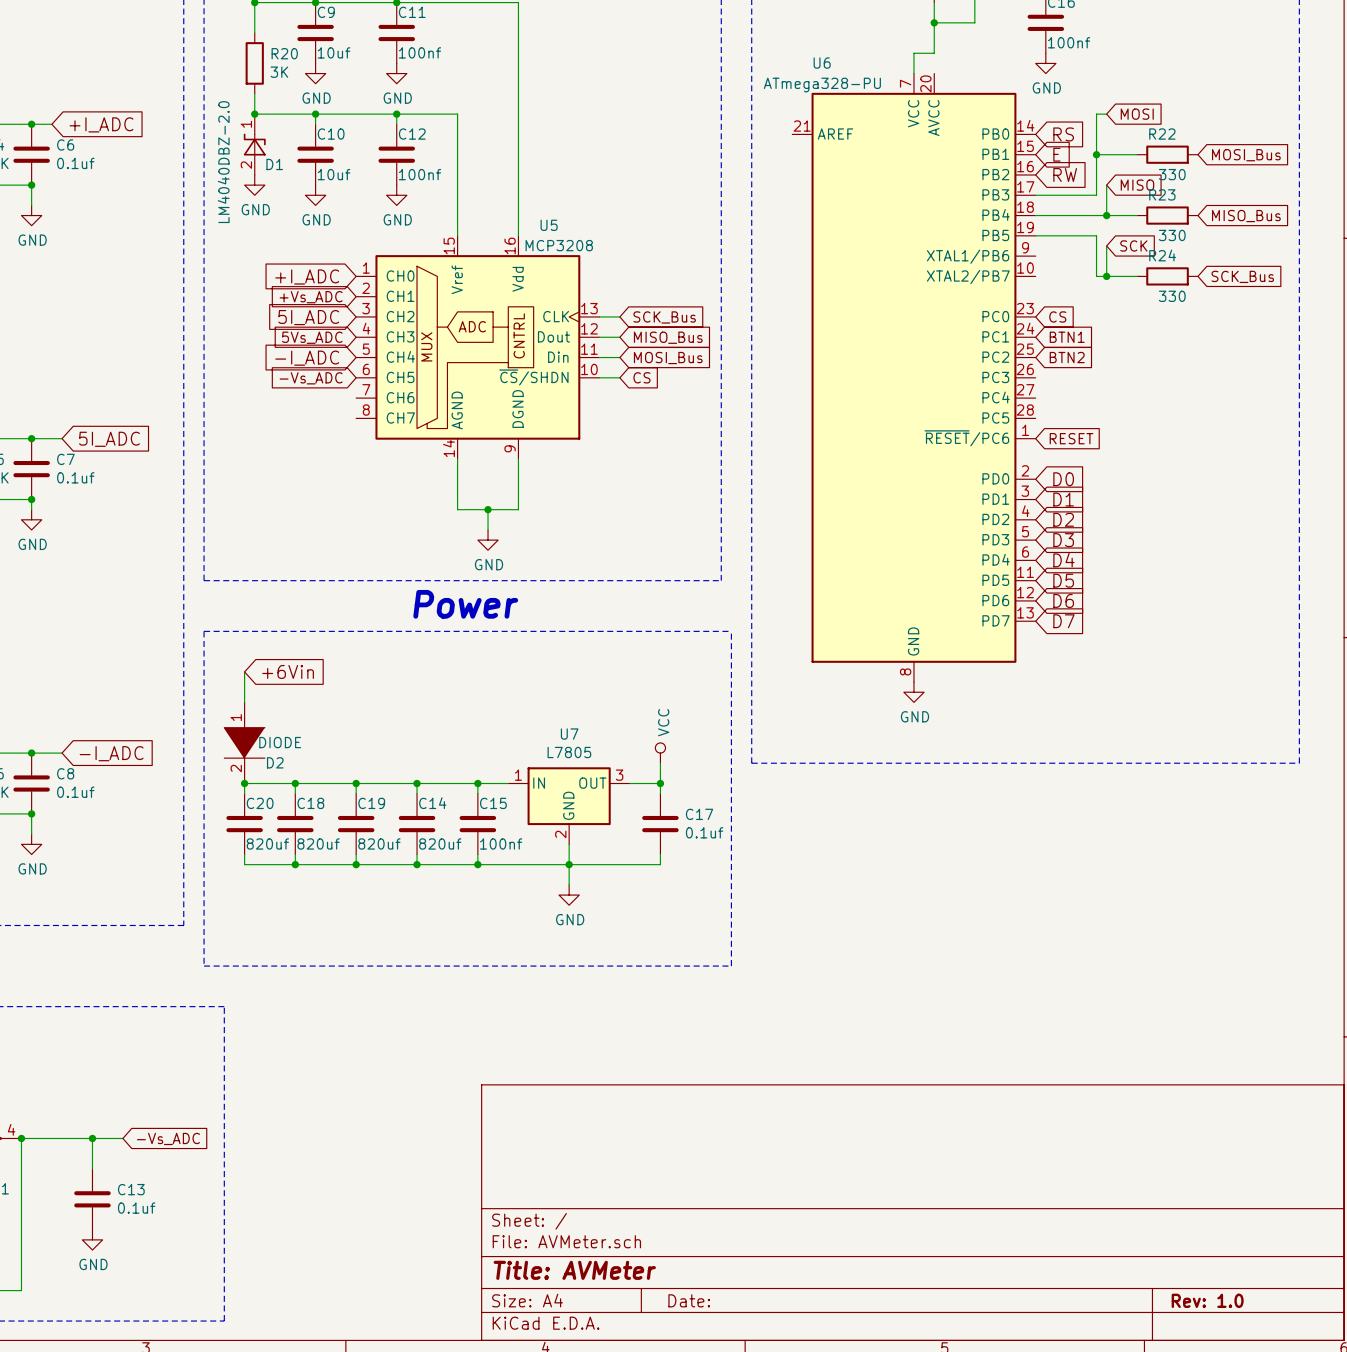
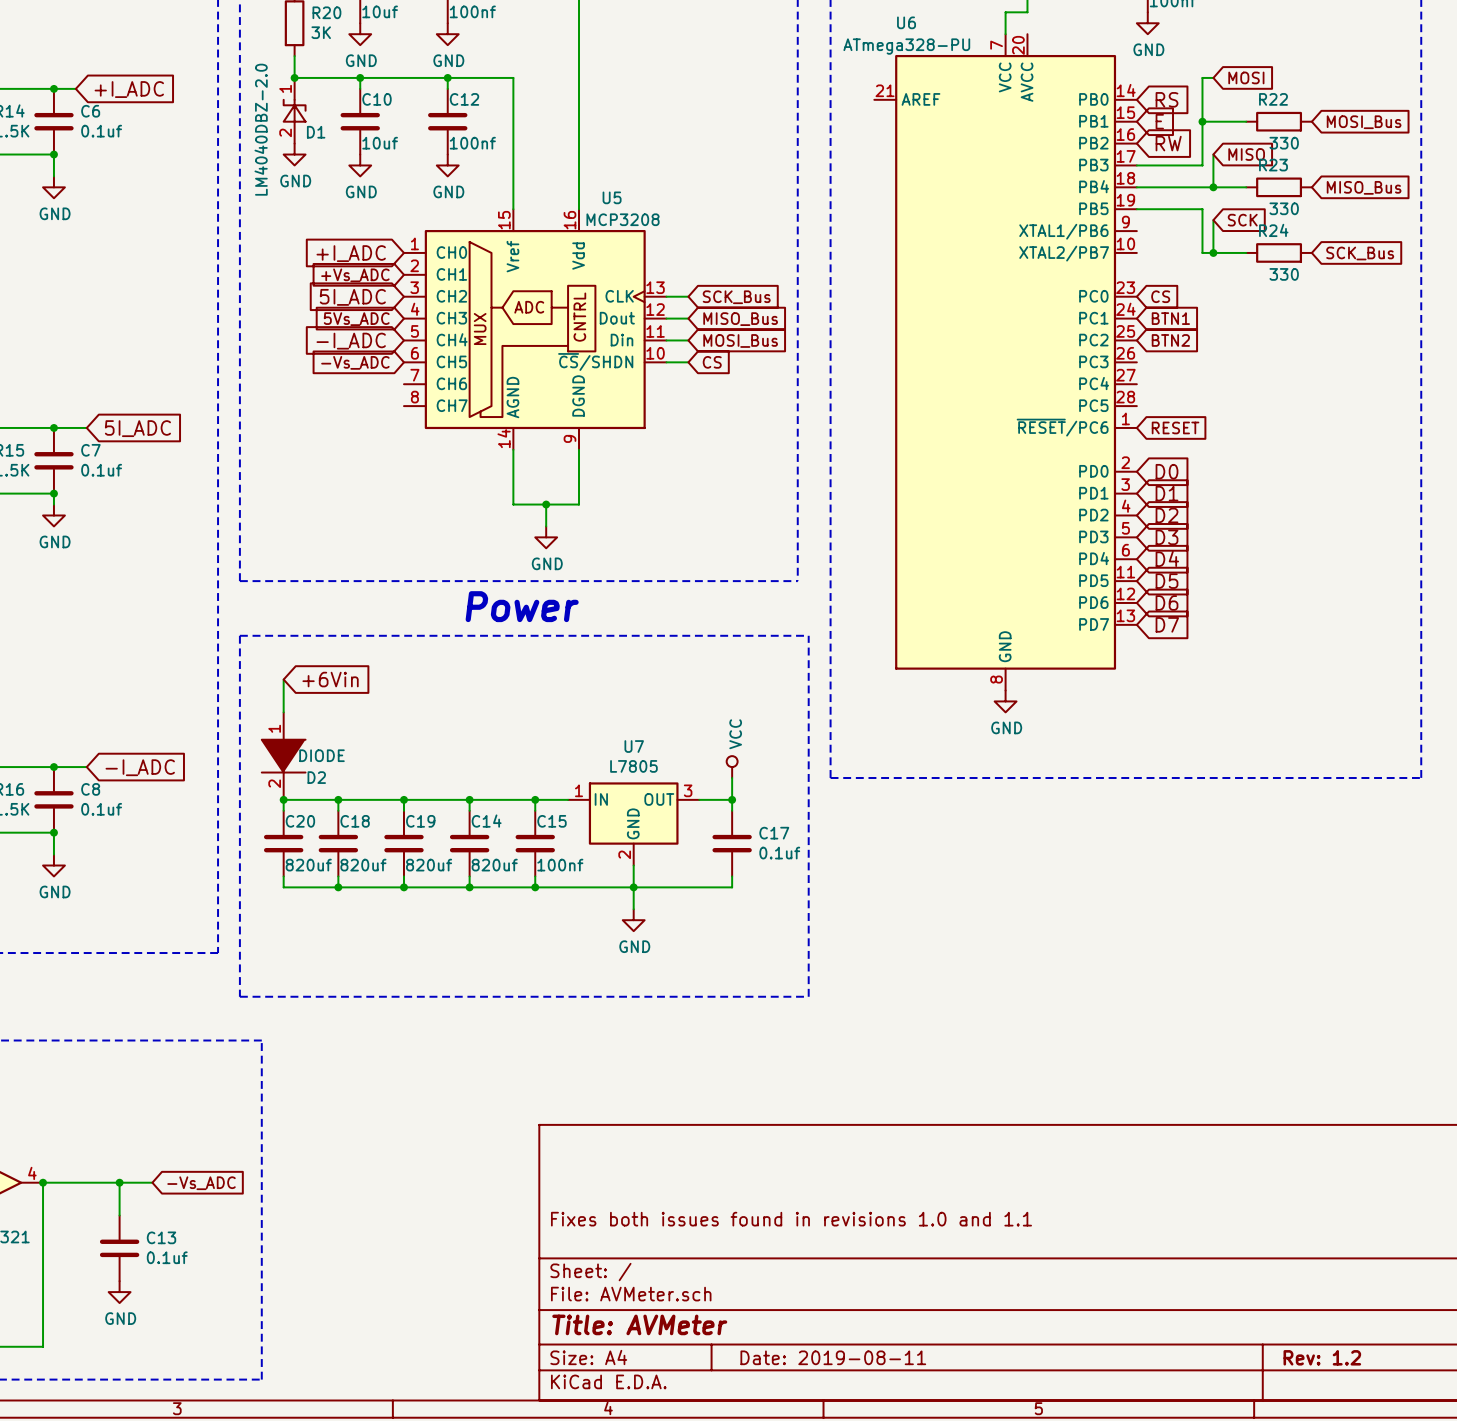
title block: none -> Fixes both issues found in revisions 1.0 and 1.1 (791, 1219)
title block: Date: (689, 1300) -> Date: 2019-08-11 (833, 1357)
title block: Rev: 1.0 (1207, 1300) -> Rev: 1.2 (1322, 1357)

